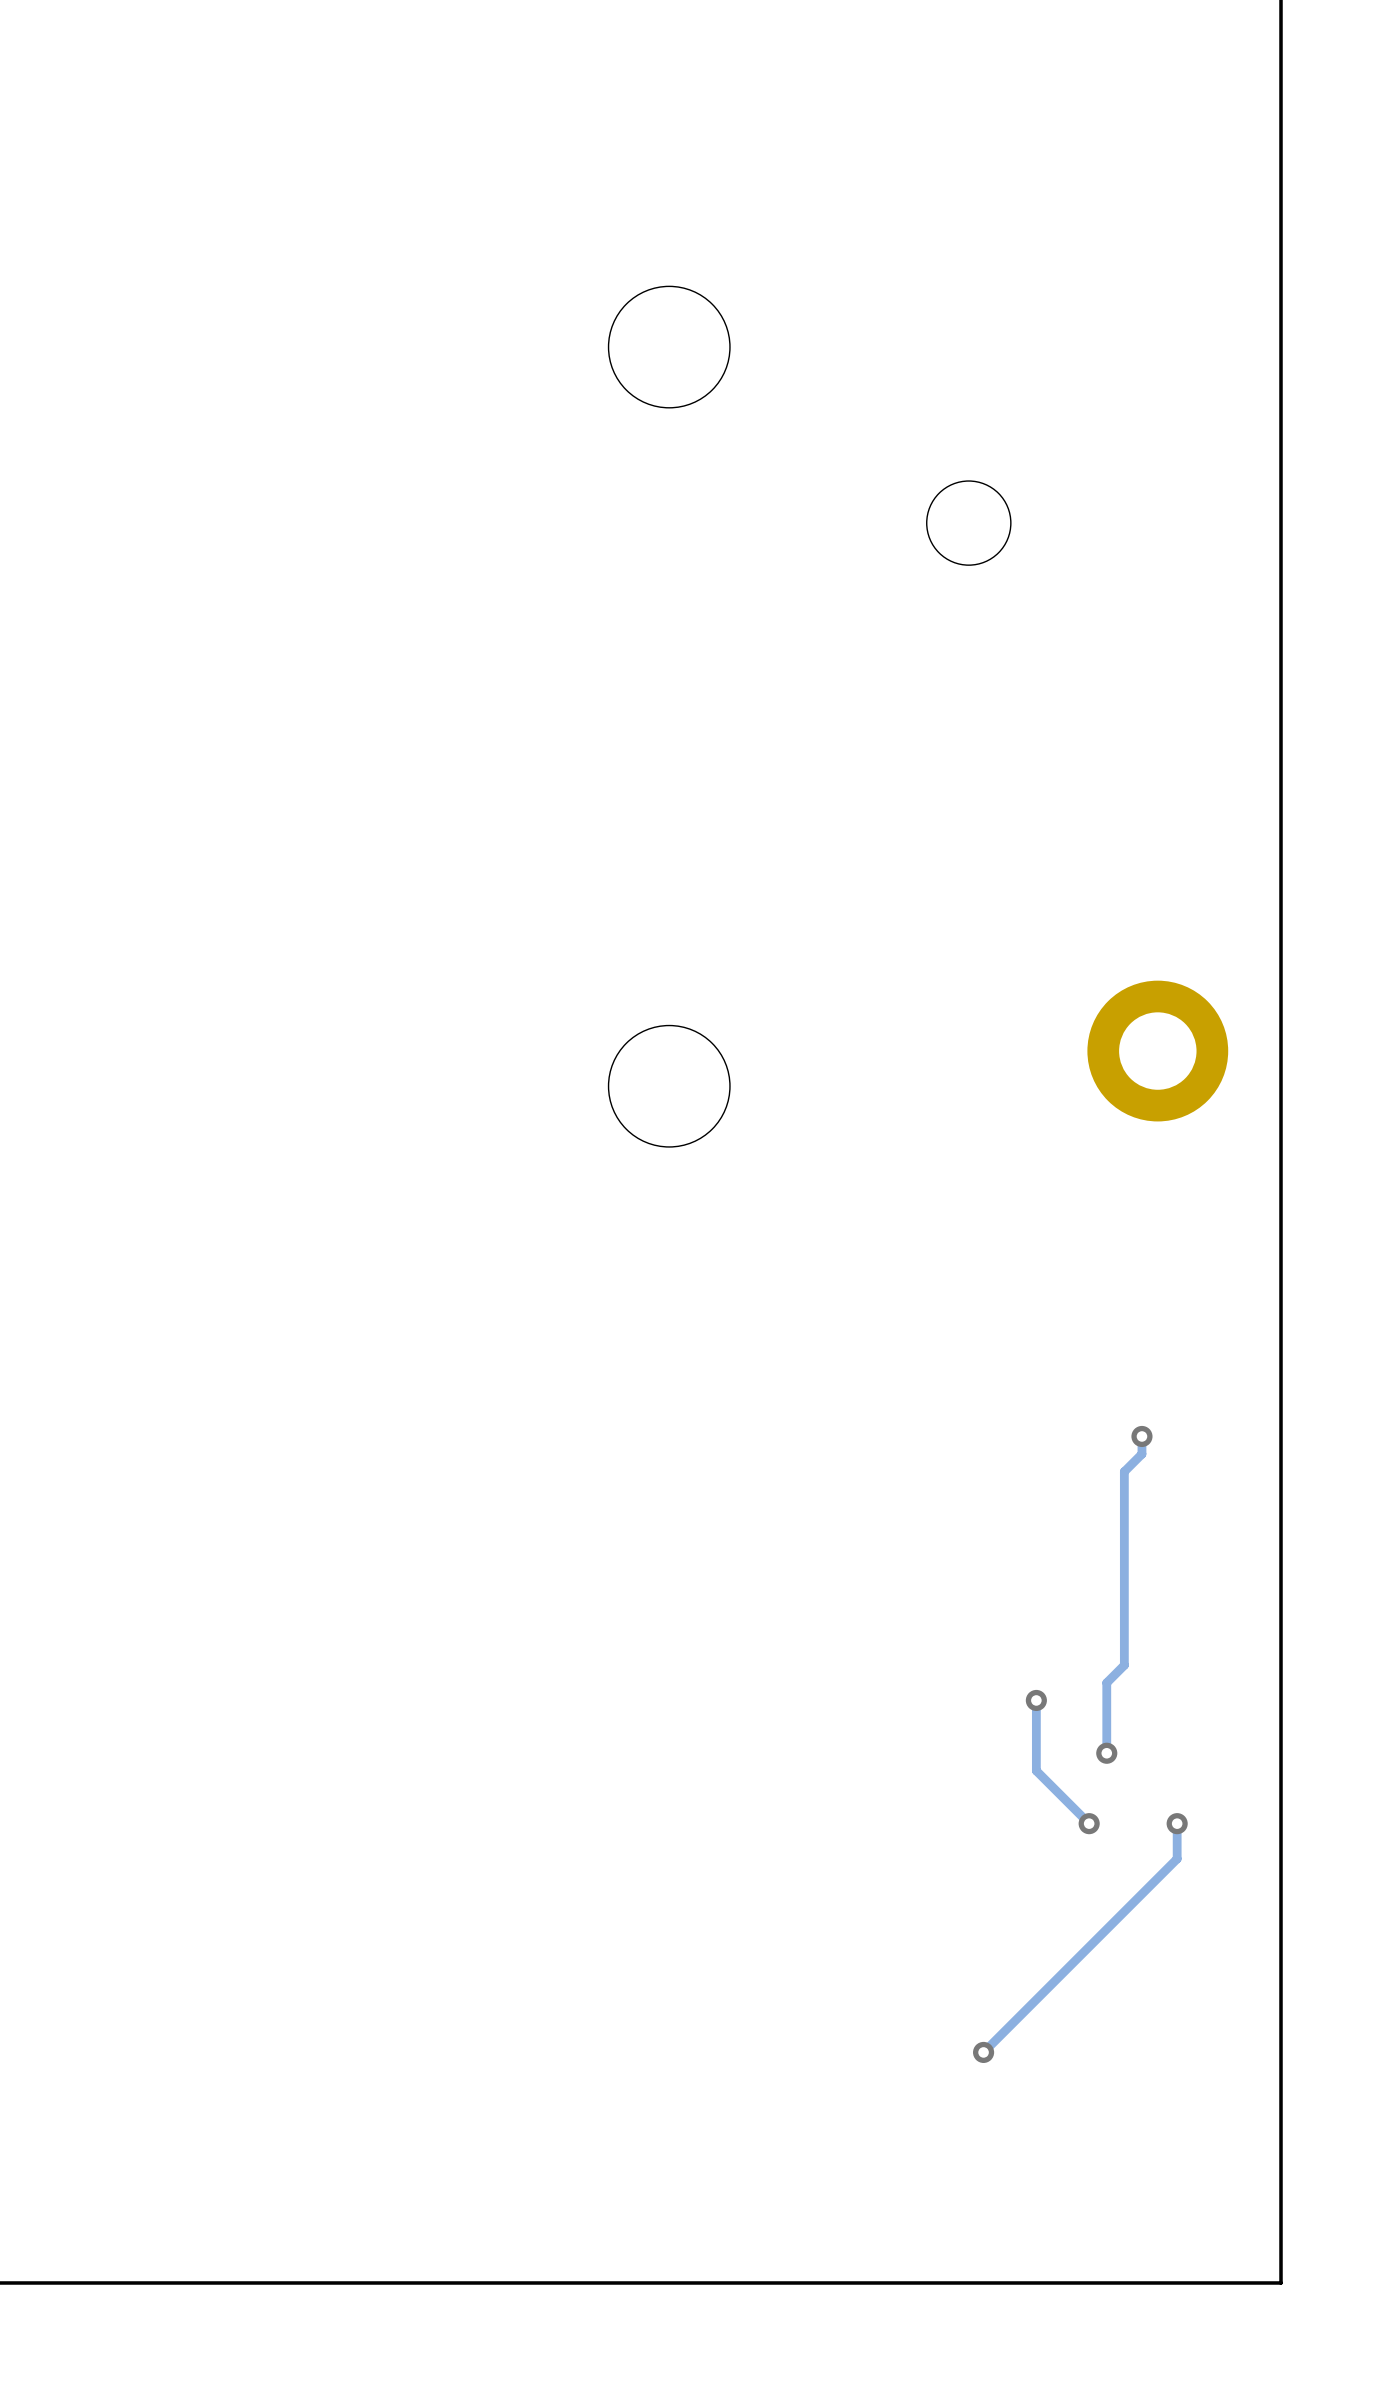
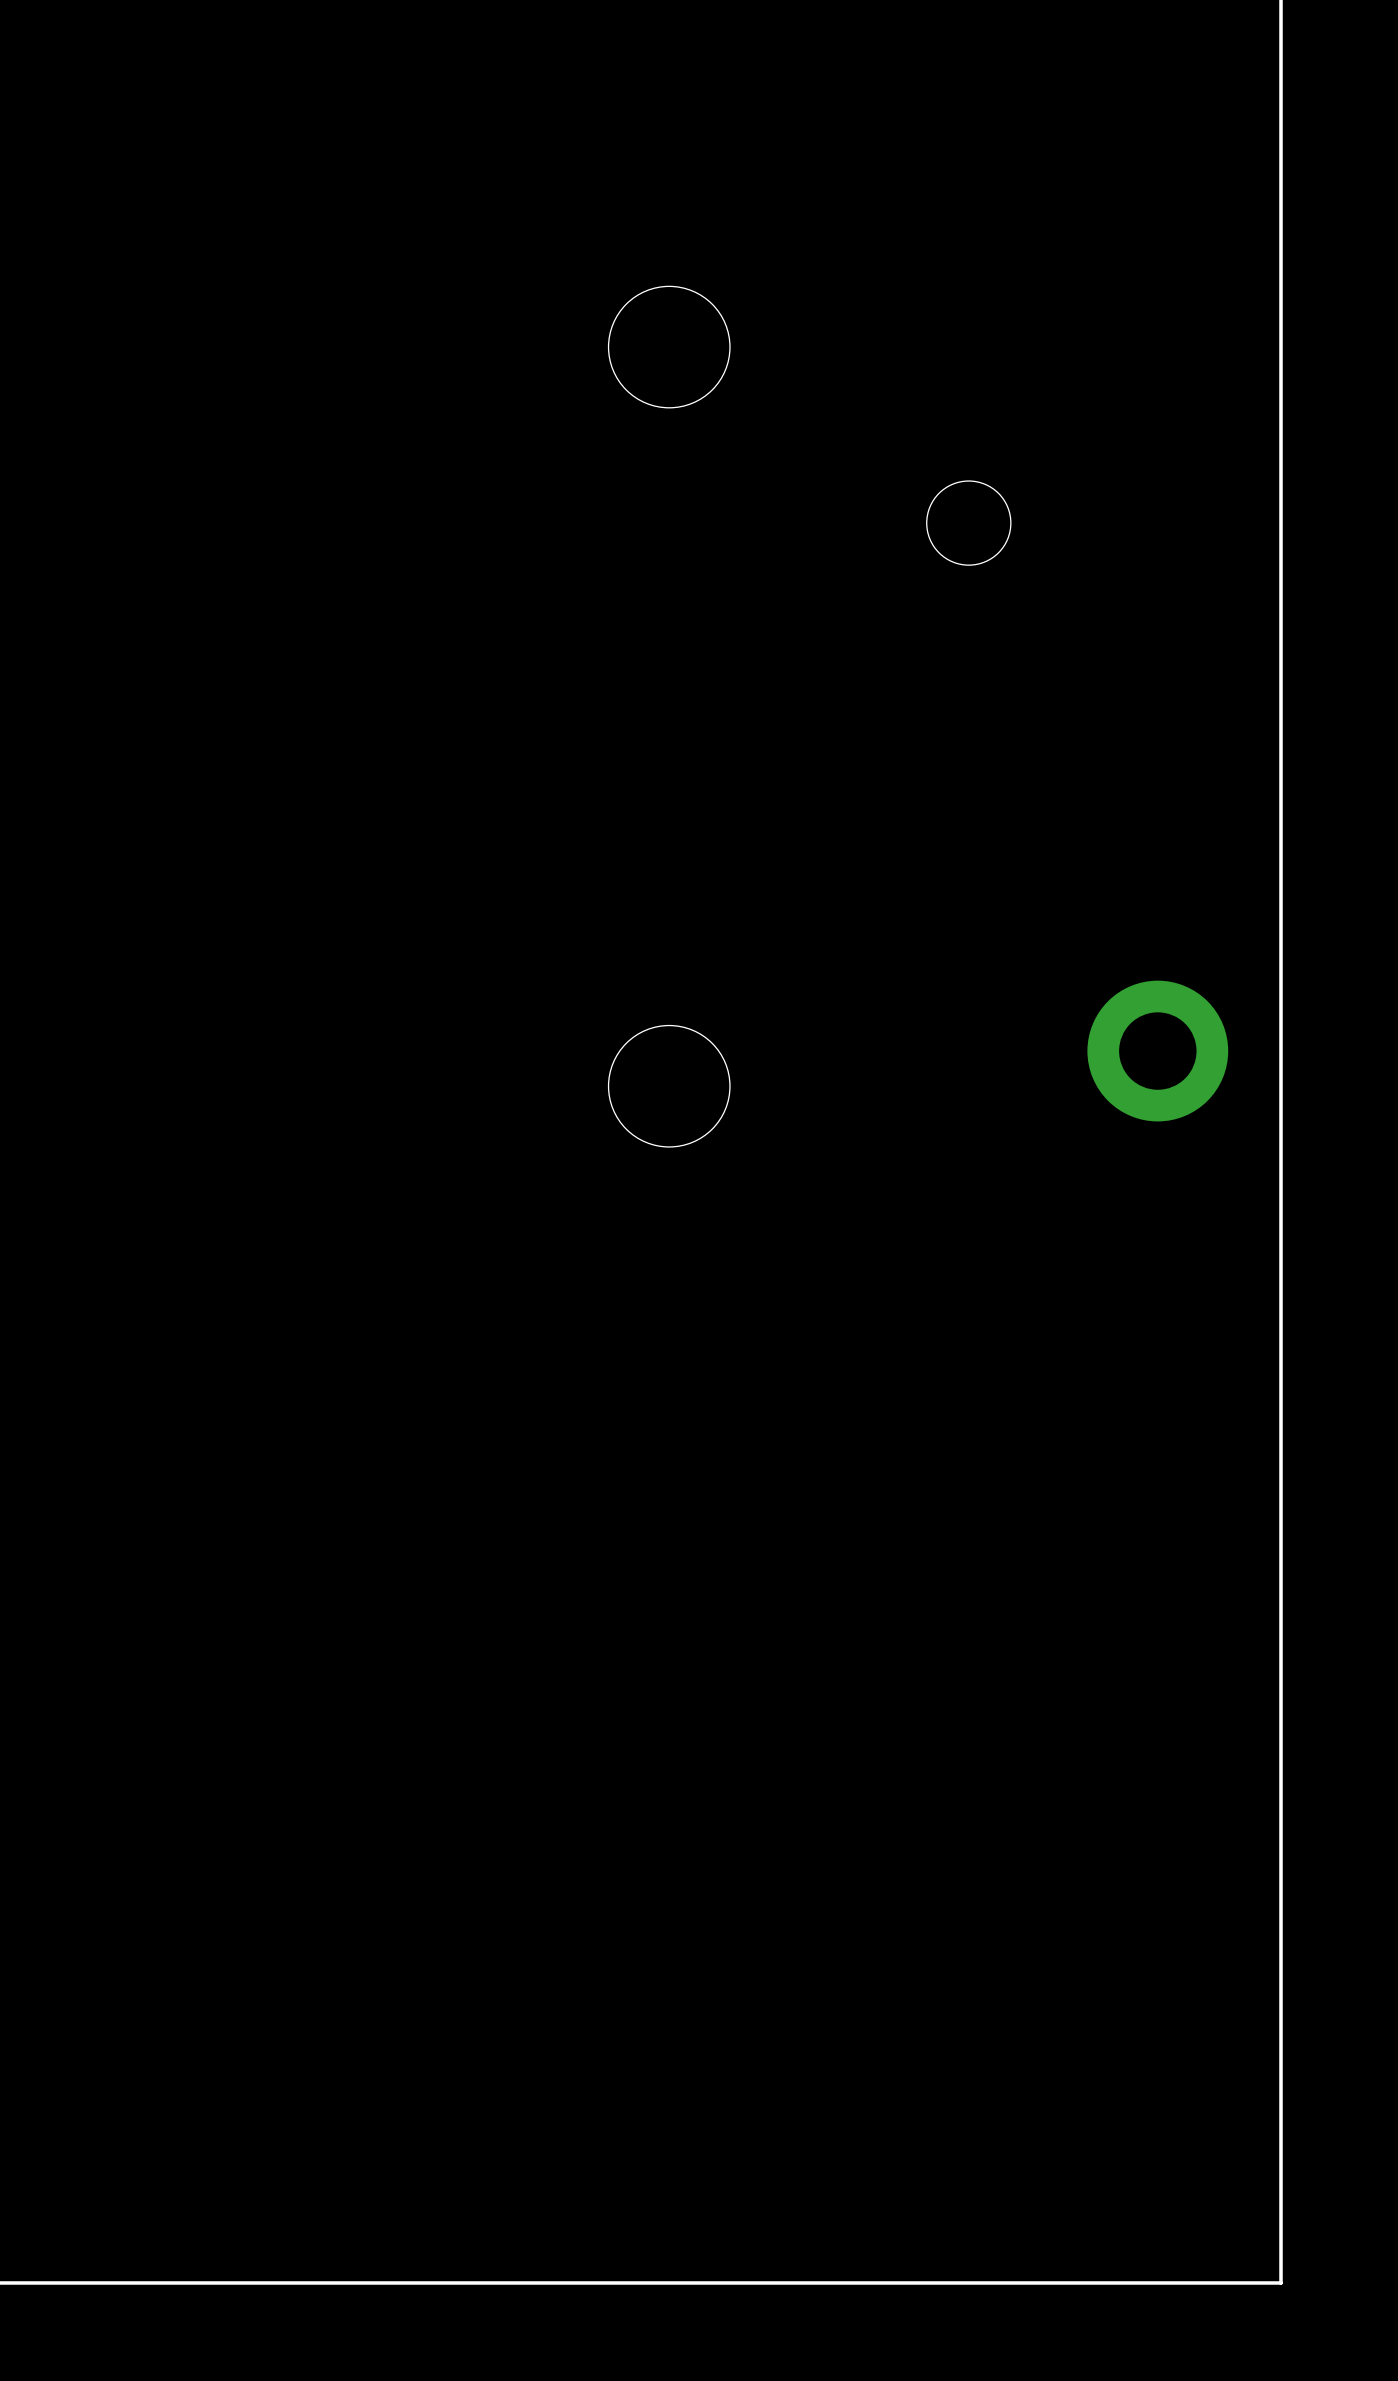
track: (1141, 1436) (1141, 1454) (1124, 1471) (1124, 1665) (1106, 1682) (1106, 1753) -> none
via: (1141, 1436) -> none
track: (1036, 1700) (1036, 1770) (1089, 1823) -> none
via: (1036, 1700) -> none
via: (1106, 1753) -> none
via: (1089, 1823) -> none
track: (1177, 1823) (1177, 1858) (983, 2052) -> none
via: (1177, 1823) -> none
via: (983, 2052) -> none

